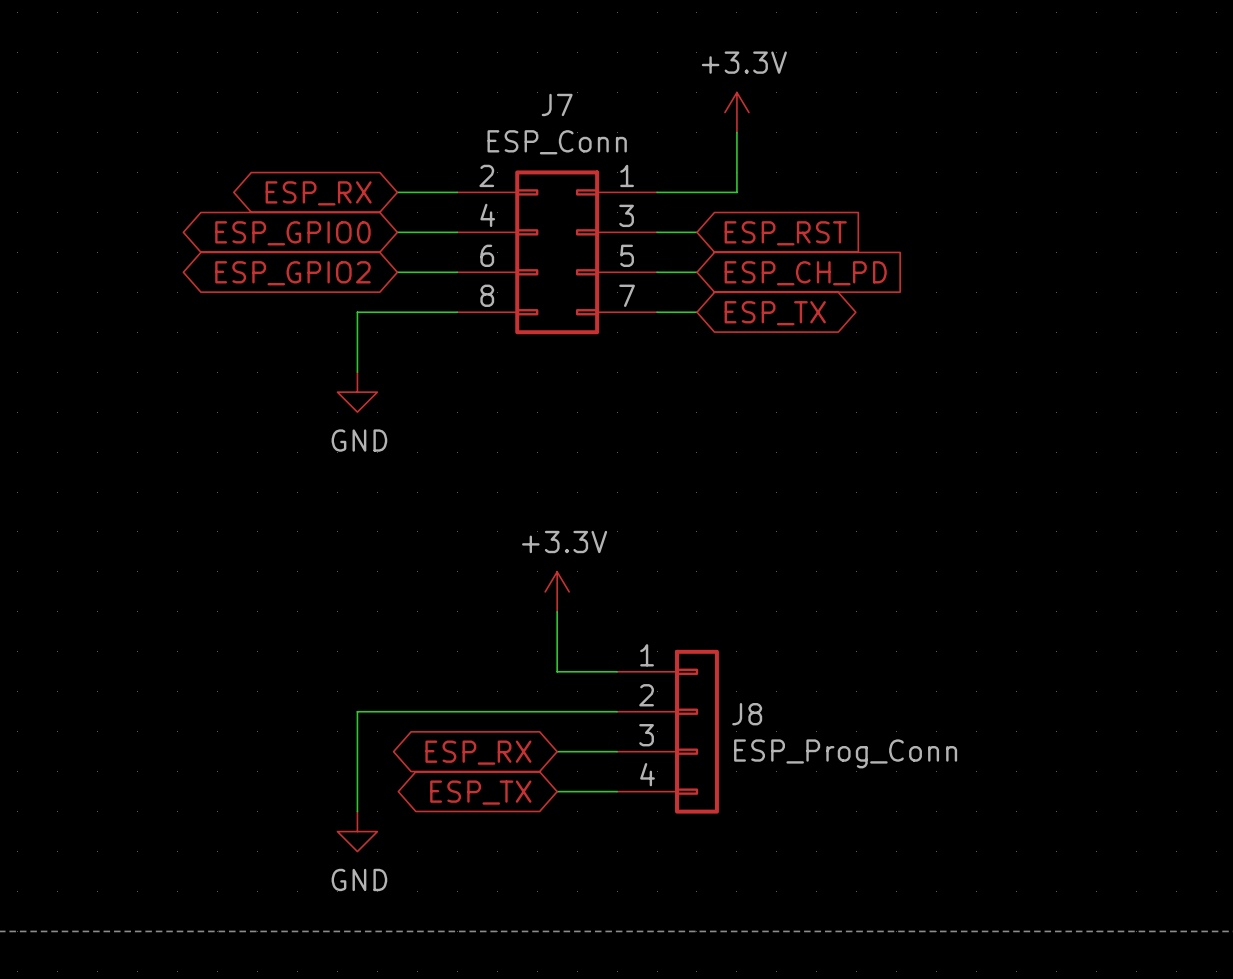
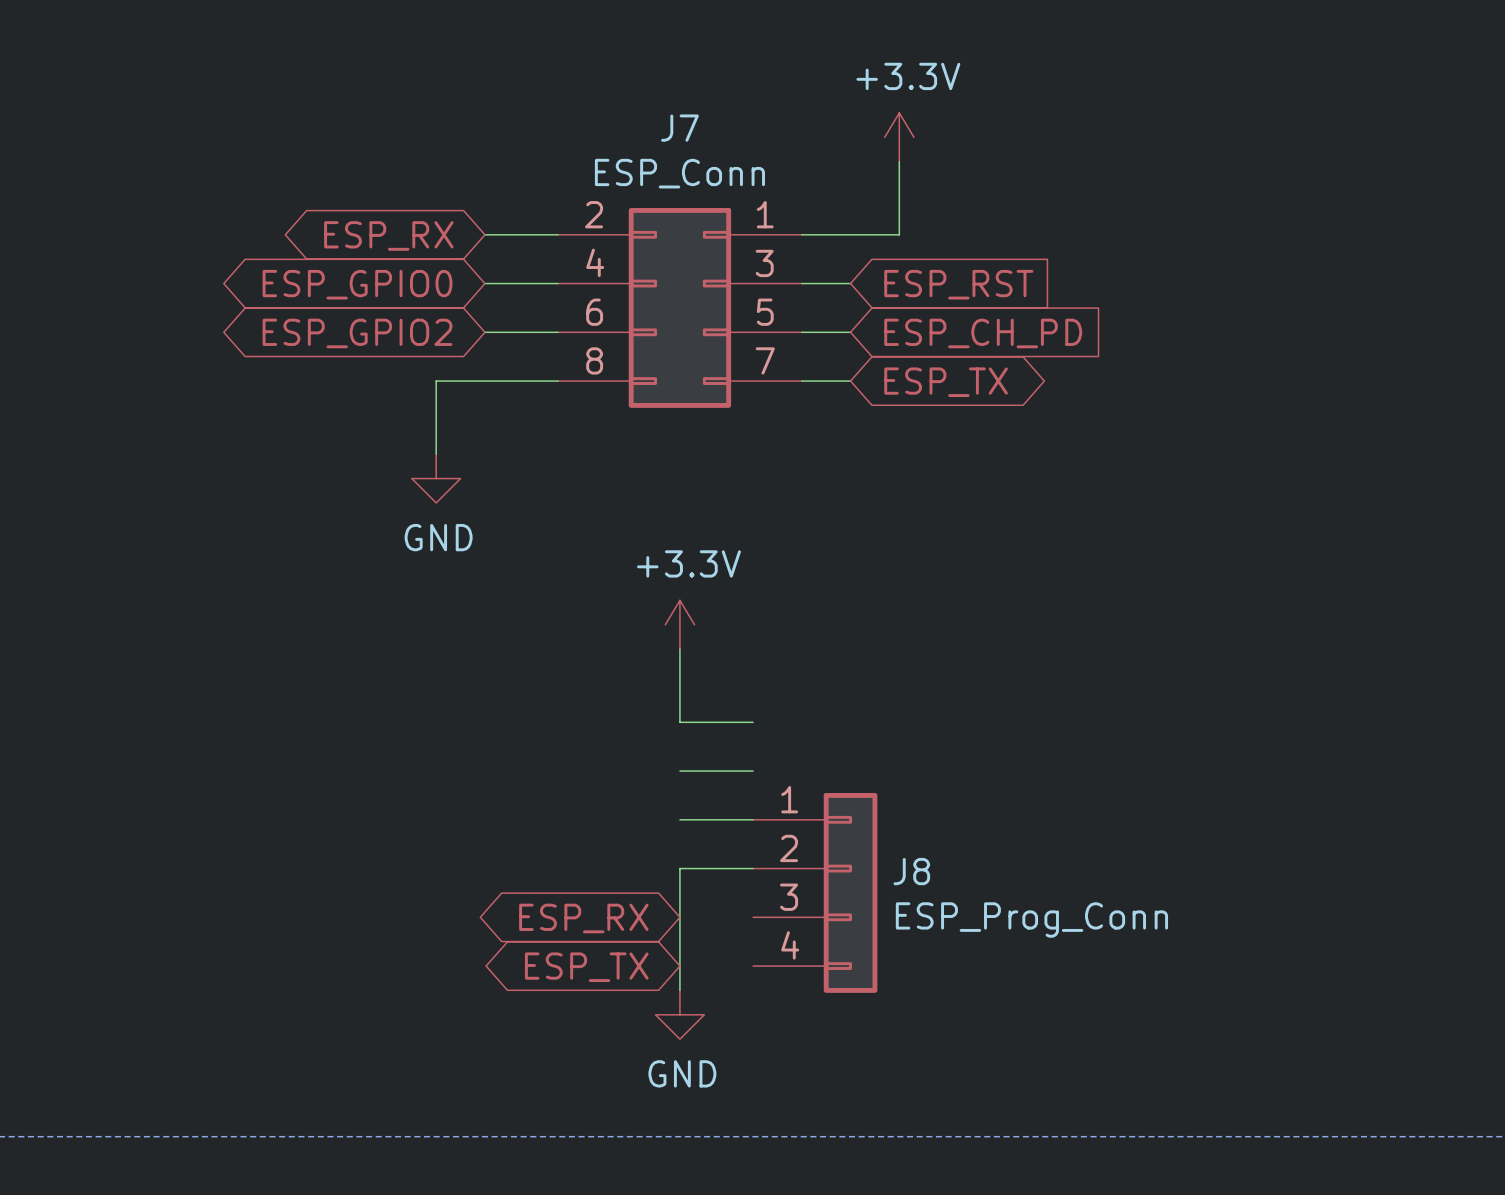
wire: none -> (679, 649) (679, 722) (753, 722)
power symbol position: +3.3V (557, 591) -> +3.3V (679, 624)
wire: (557, 611) (557, 671) -> none
wire: (557, 711) (357, 711) (357, 811) -> (679, 868) (679, 990)
wire: (557, 751) (617, 751) -> (679, 771) (753, 771)
wire: (557, 791) (617, 791) -> none
power symbol position: GND (357, 831) -> GND (679, 1014)

